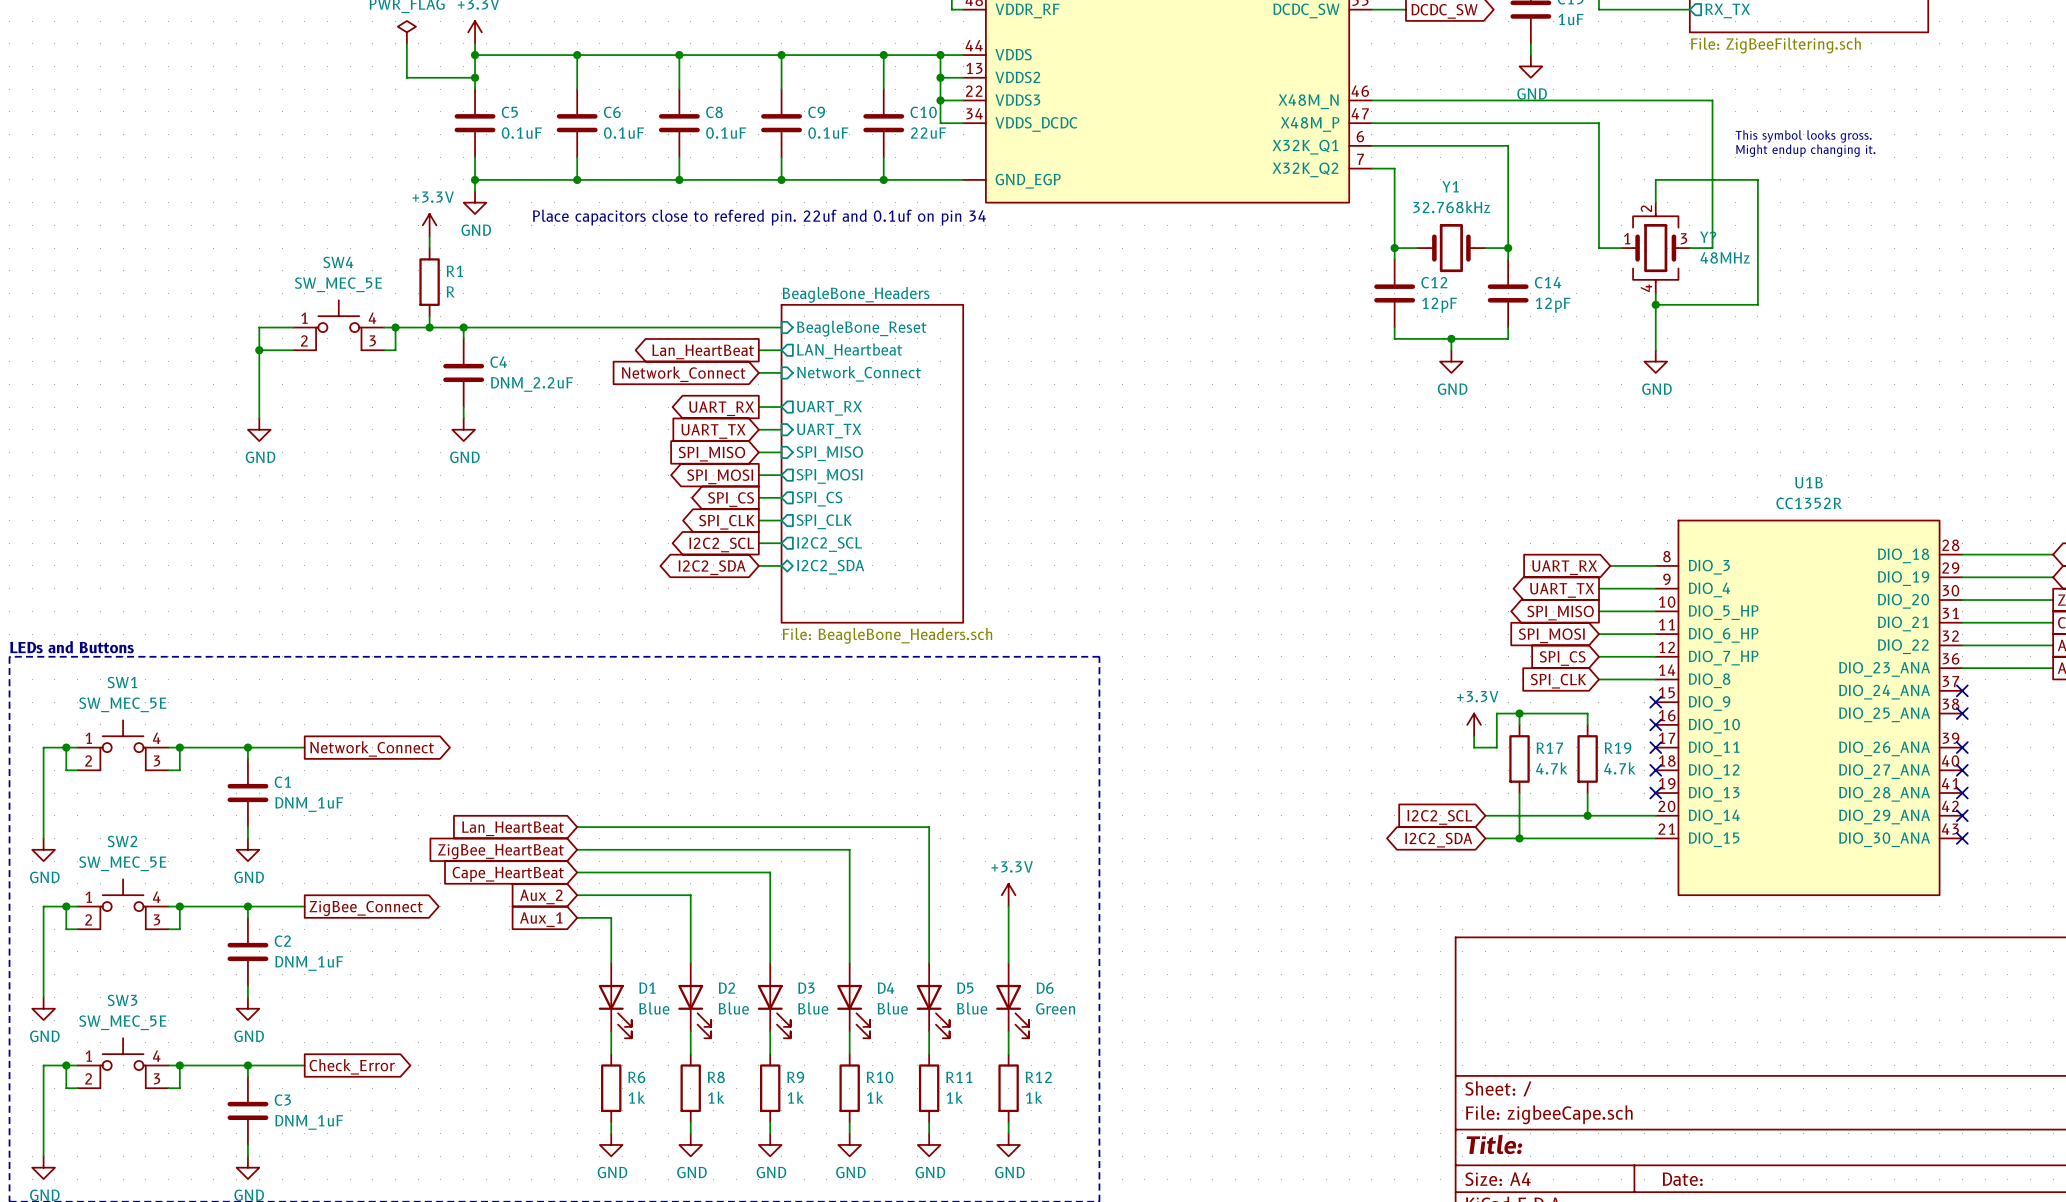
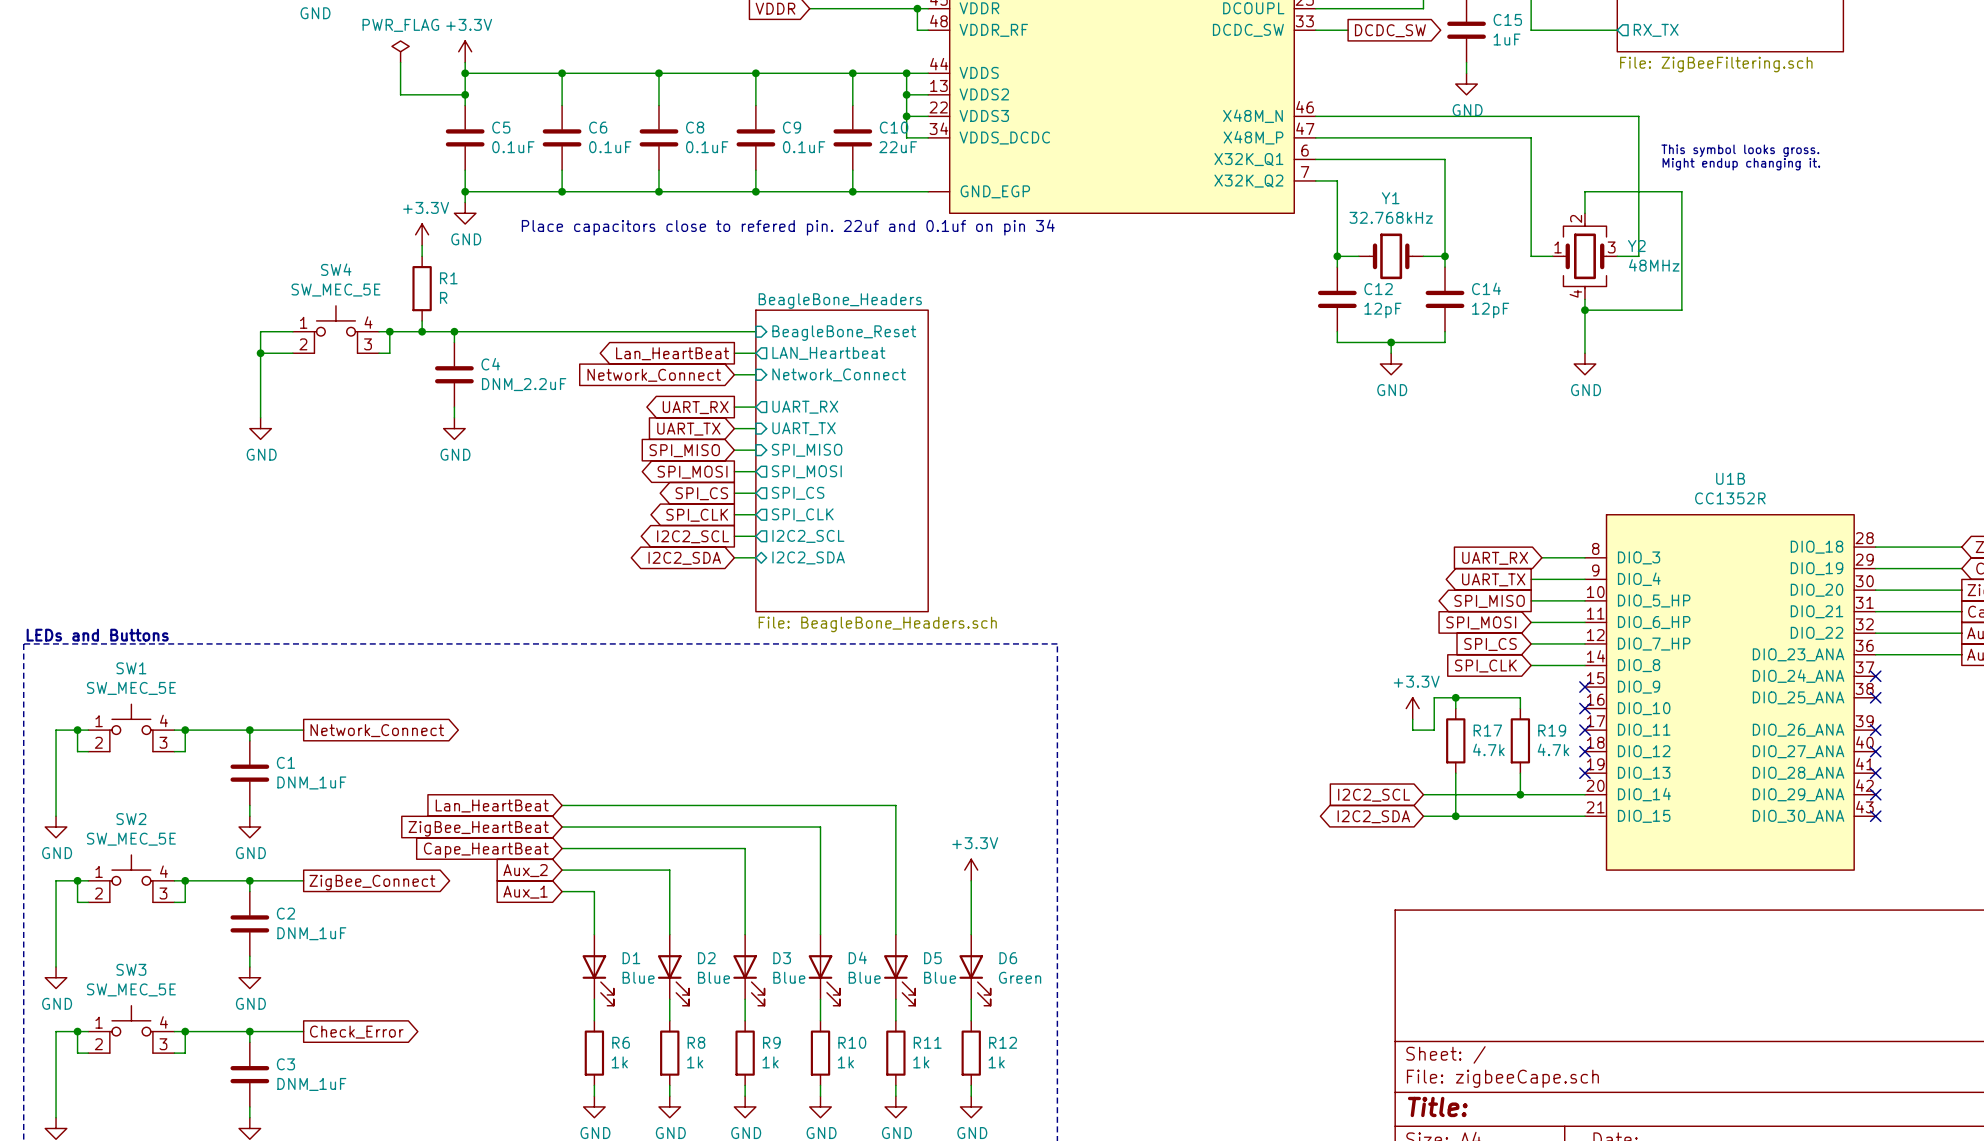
Y? name: Y? (1708, 237) -> Y2 (1636, 246)

